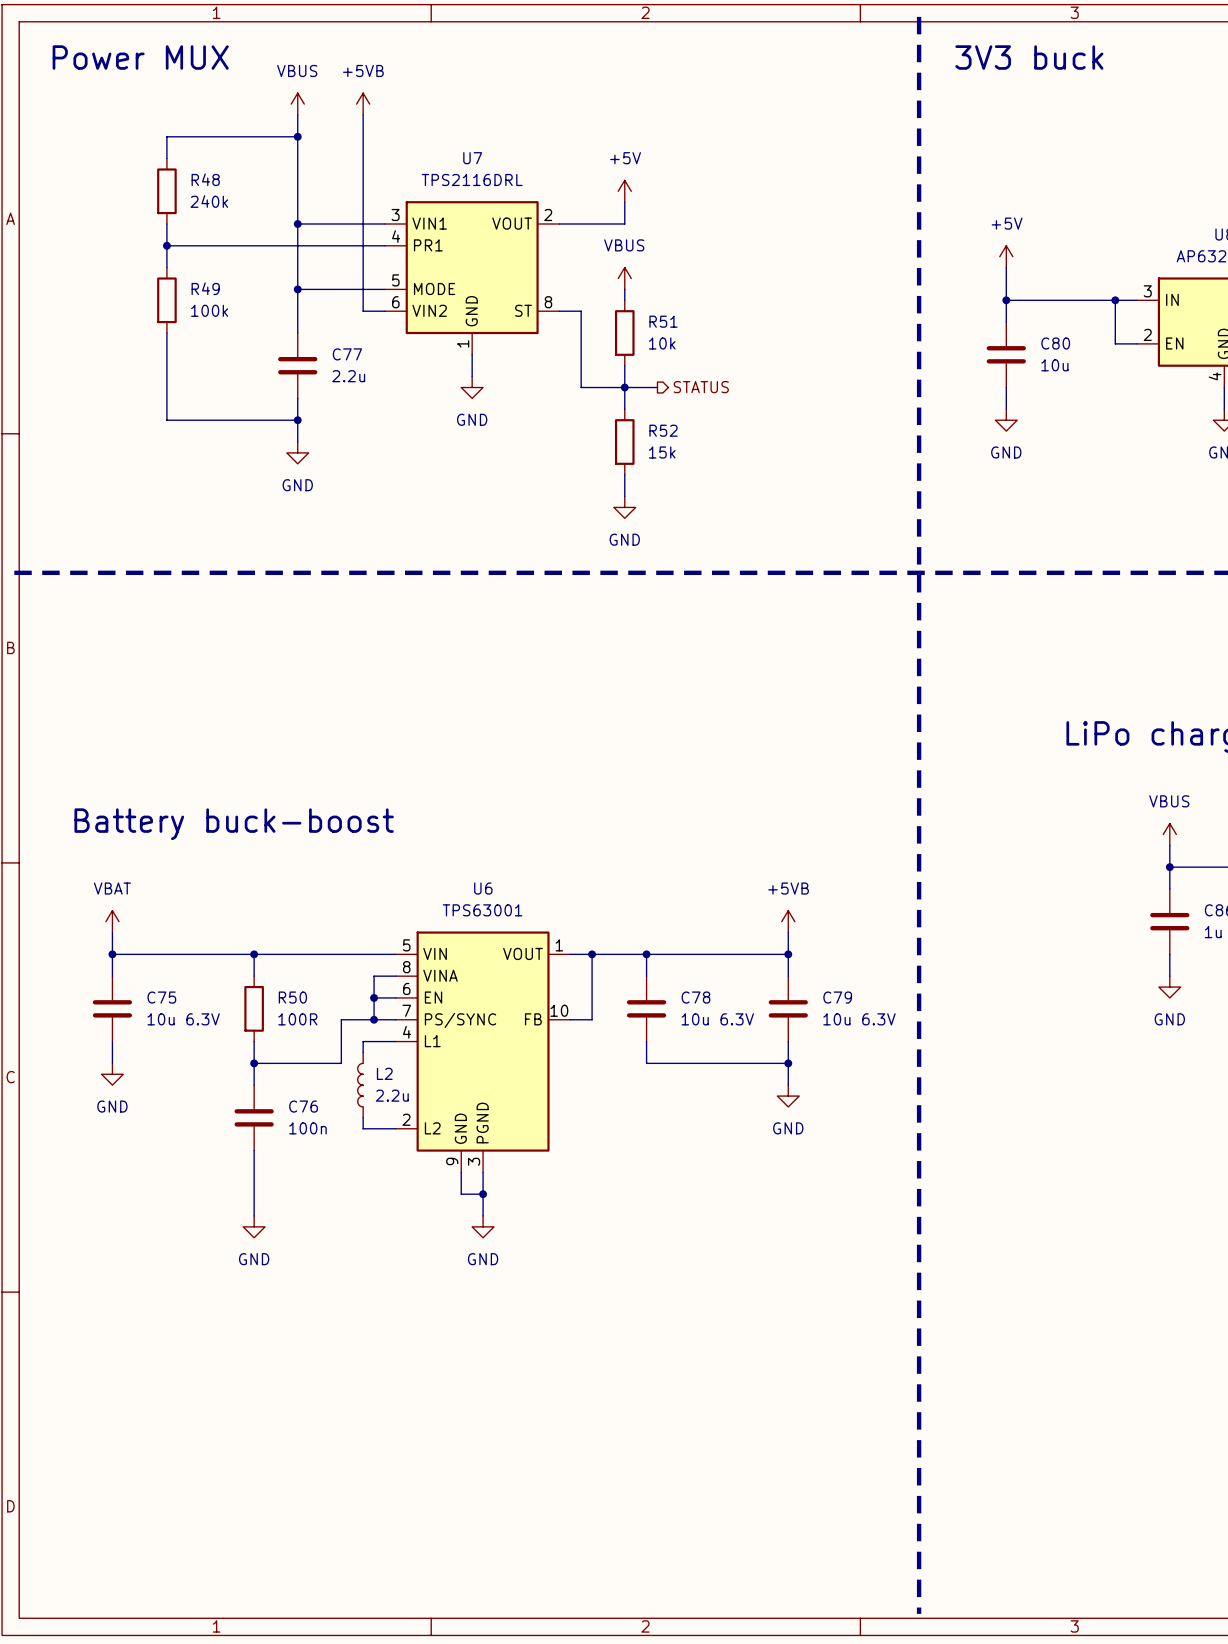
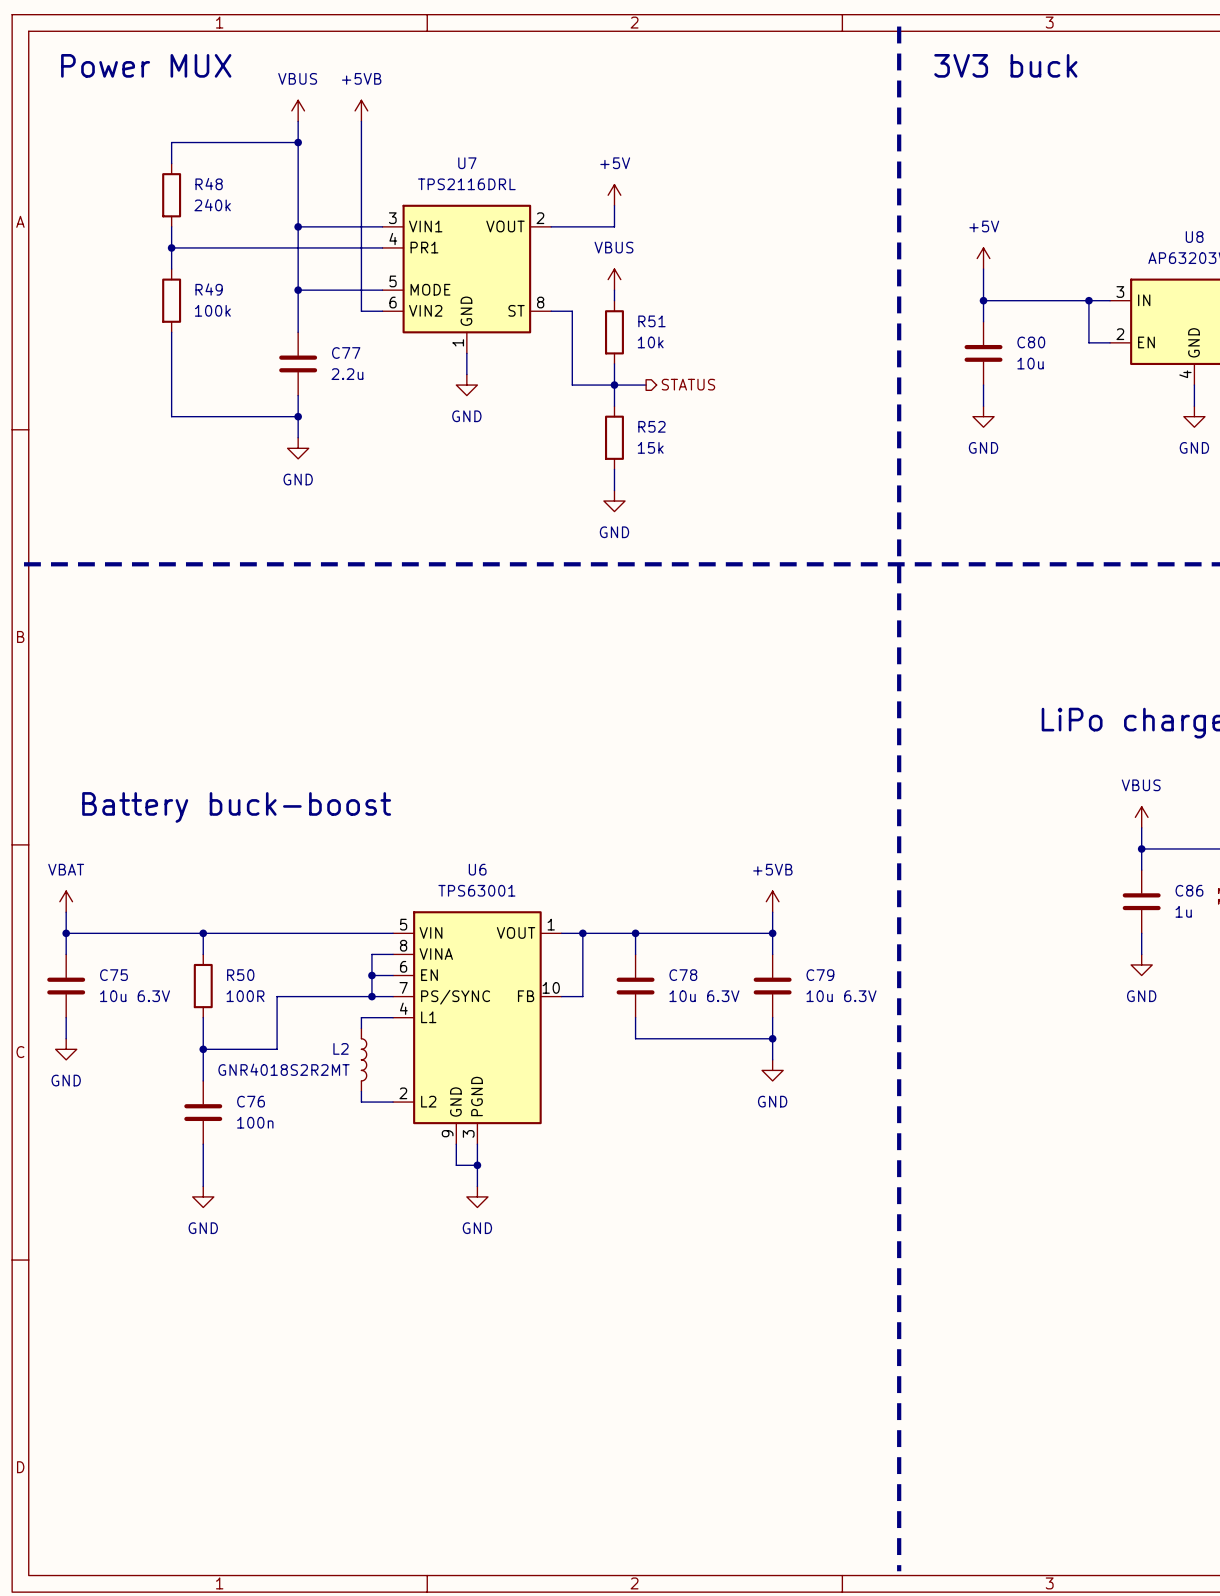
power symbol position: VBAT (112, 921) -> VBAT (66, 901)
wire: (112, 932) (112, 976) -> (66, 912) (66, 954)
wire: none -> (66, 933) (118, 933)
junction: none -> (66, 933)
junction: (112, 954) -> none
junction: none -> (203, 933)
wire: (254, 954) (254, 976) -> (203, 933) (203, 954)
junction: (254, 954) -> none
C75 position: (112, 1008) -> (66, 986)
R50 position: (254, 1008) -> (203, 986)
wire: (341, 1019) (341, 1063) (254, 1063) -> (340, 996) (277, 996) (277, 1049) (203, 1049)
wire: (112, 1041) (112, 1063) -> (66, 1017) (66, 1038)
wire: (254, 1041) (254, 1085) -> (203, 1144) (203, 1186)
junction: (254, 1063) -> none
L2 name position: L2 (384, 1073) -> L2 (341, 1048)
power symbol position: GND (112, 1074) -> GND (66, 1049)
junction: none -> (203, 1049)
L2 rotation: 0° (360, 1085) -> 180° (364, 1059)
L2 value: 2.2u (392, 1095) -> GNR4018S2R2MT (284, 1069)
C76 position: (254, 1117) -> (203, 1112)
wire: (254, 1150) (254, 1215) -> (203, 1017) (203, 1080)
power symbol position: GND (254, 1226) -> GND (203, 1196)

